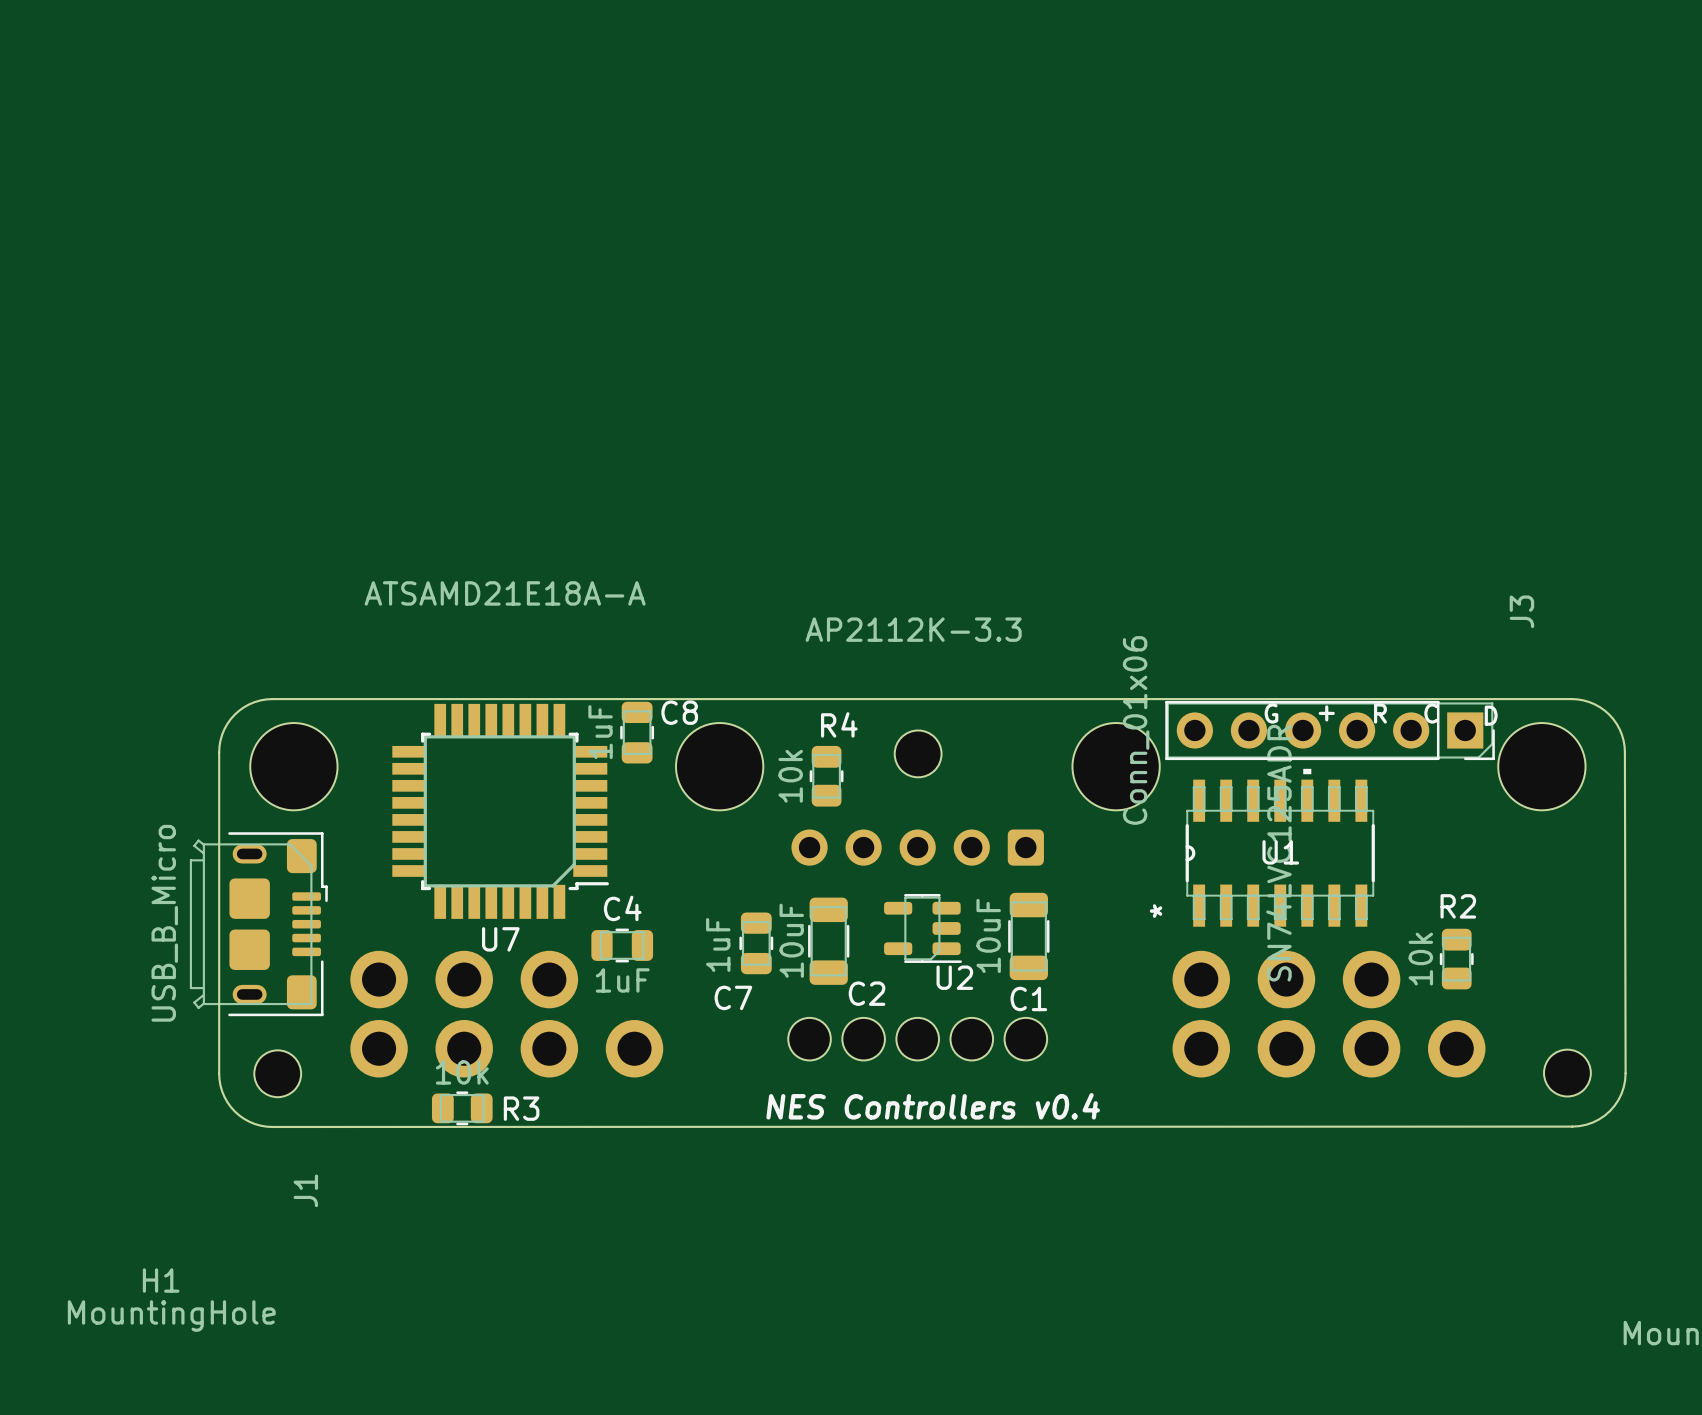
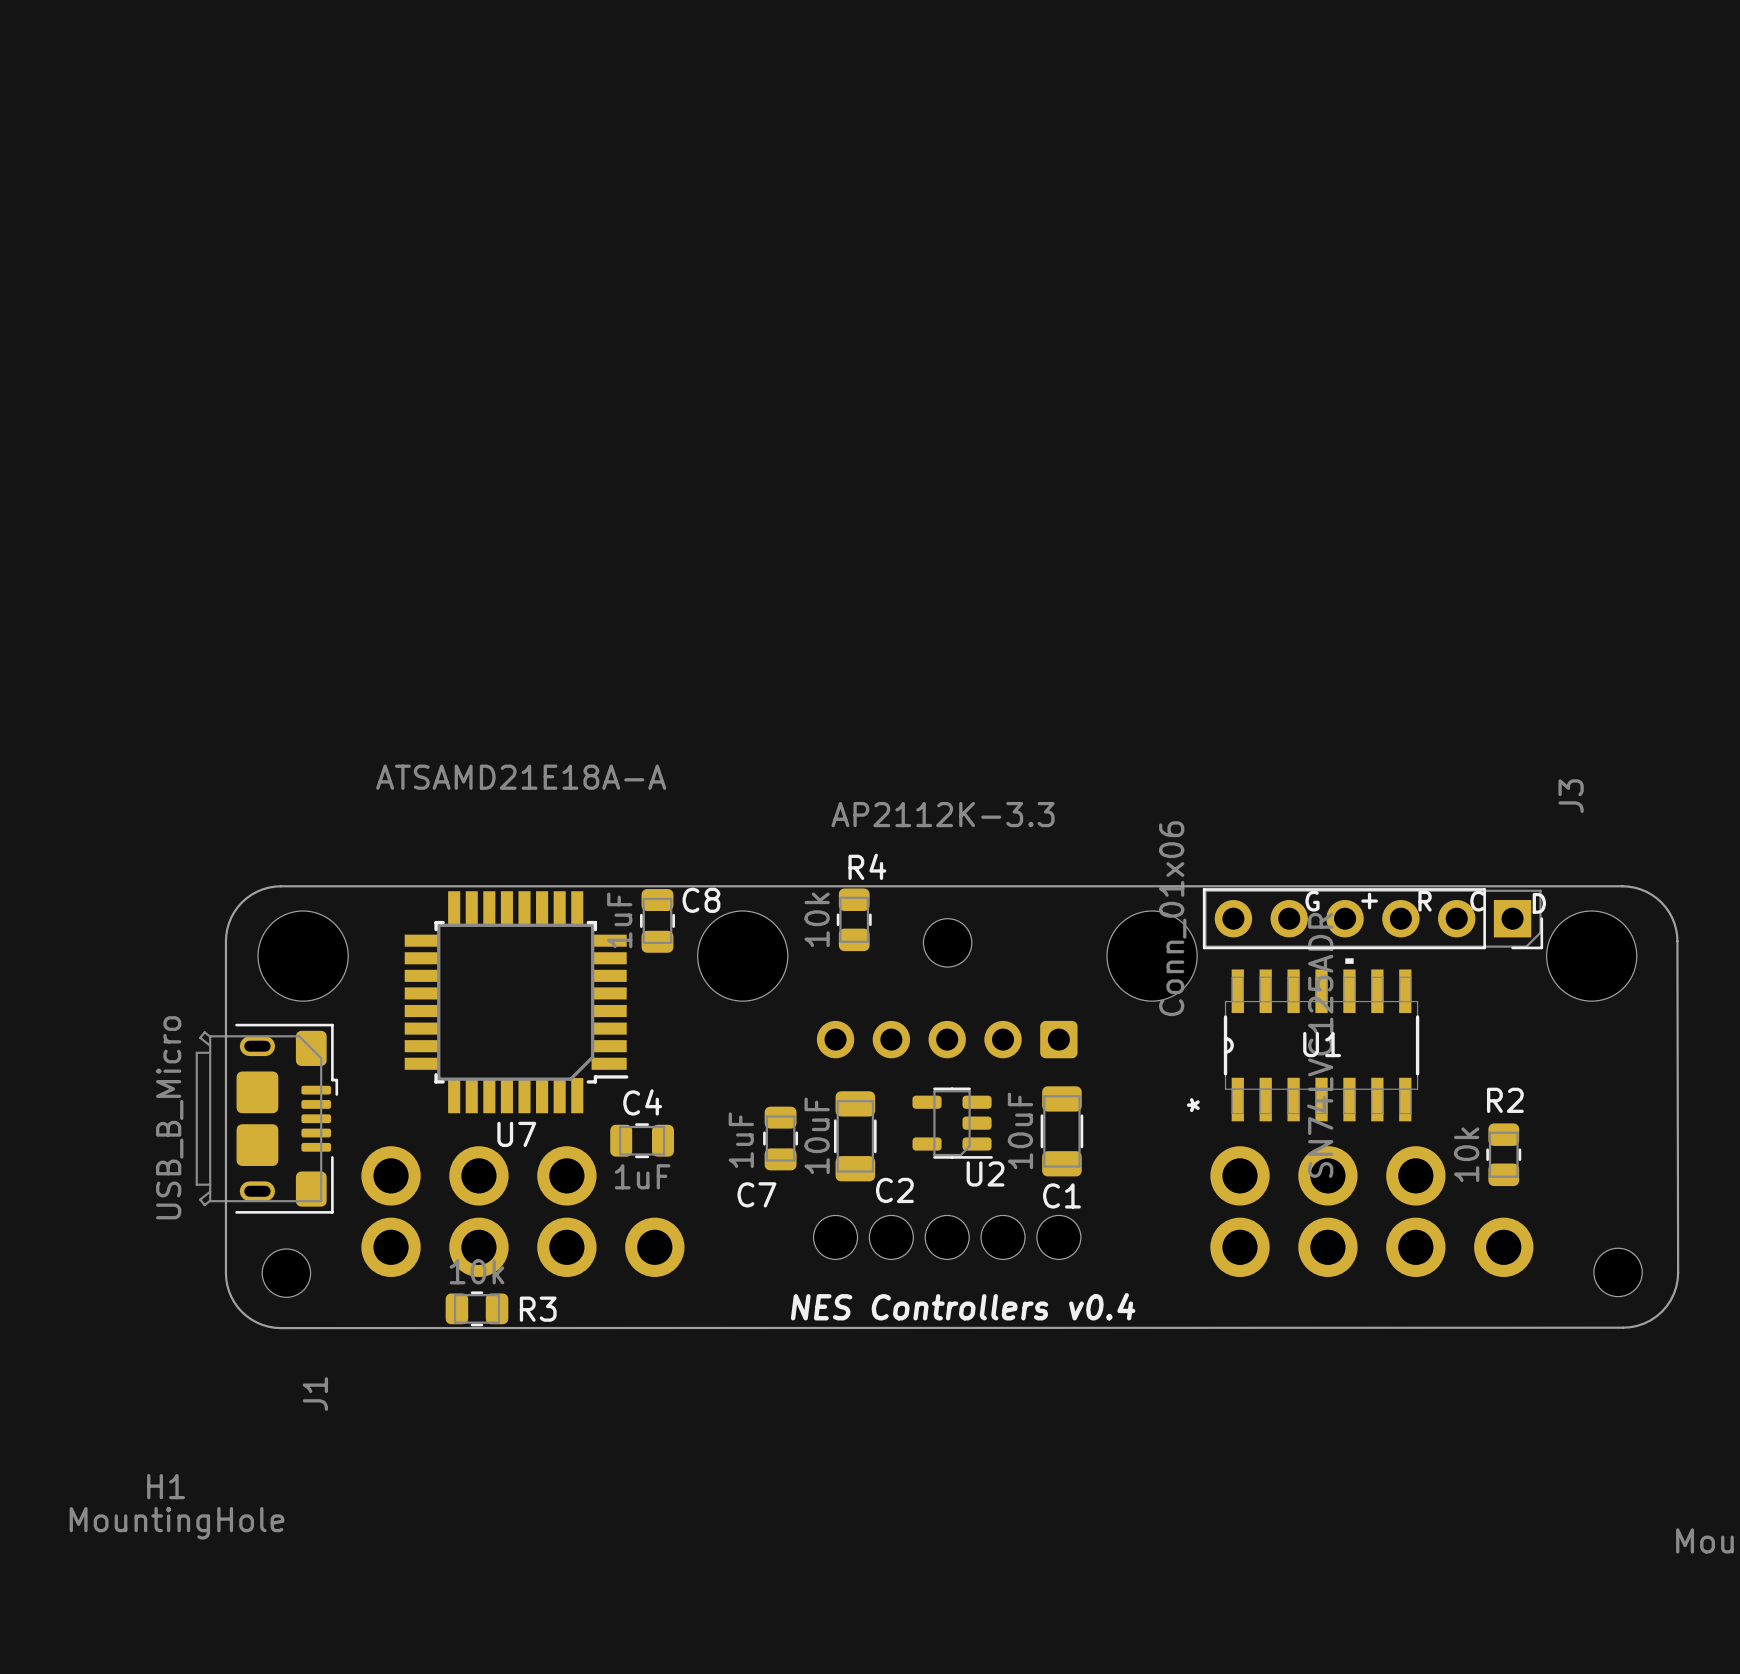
R4 position: (826, 776) -> (854, 919)

